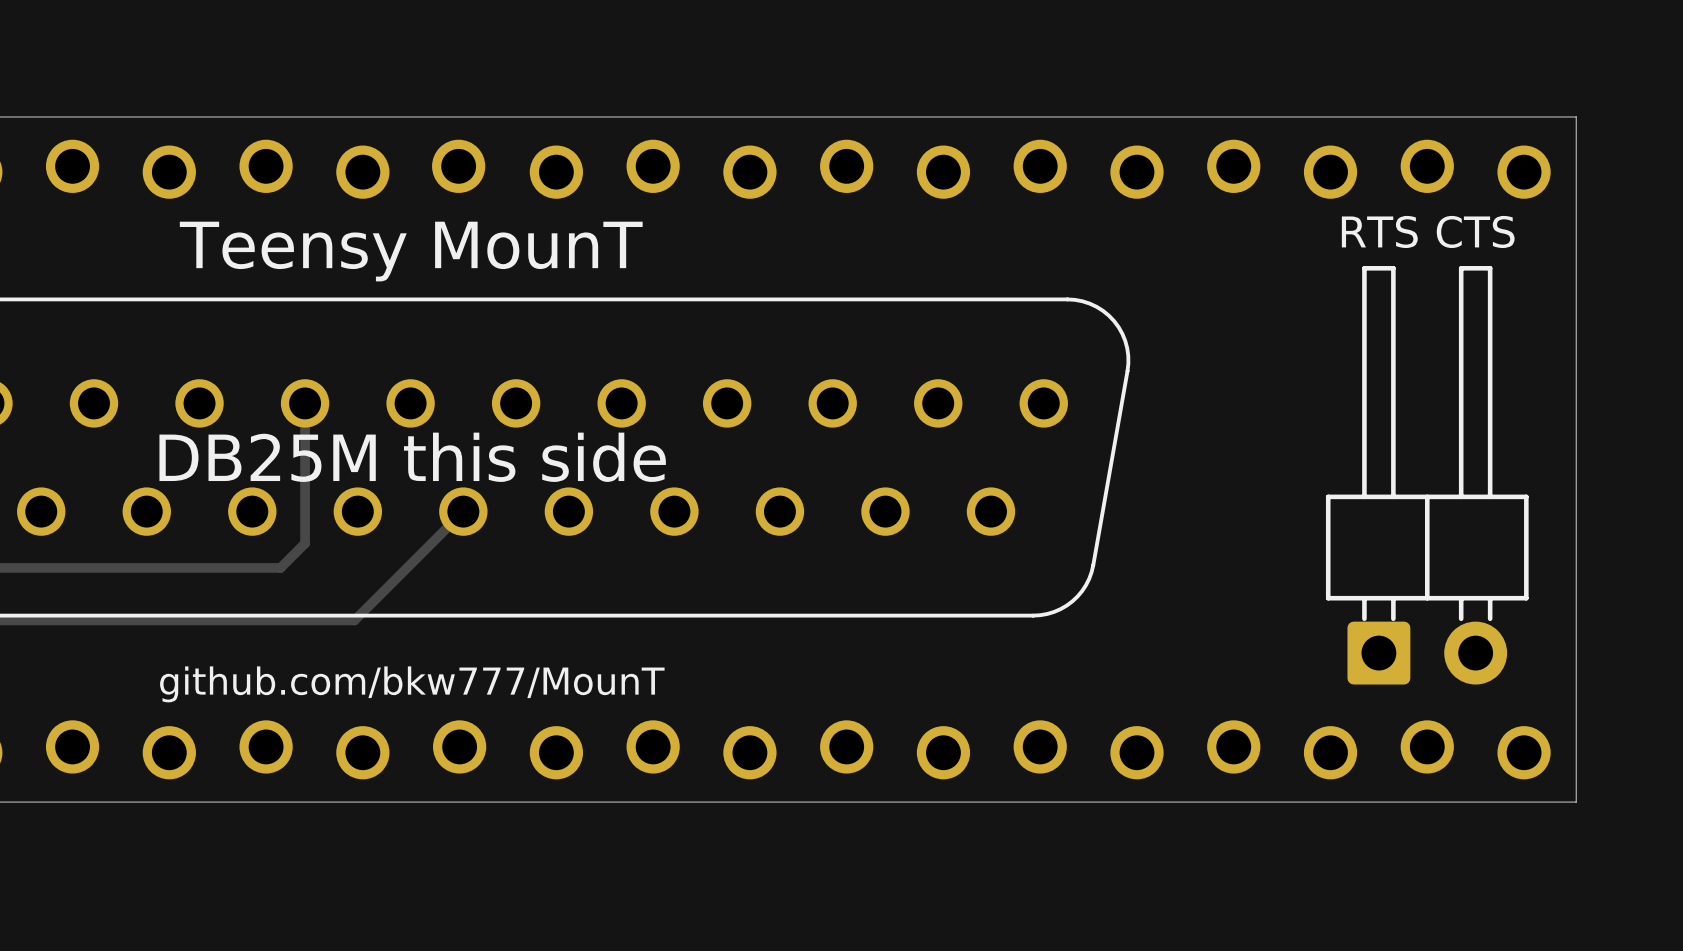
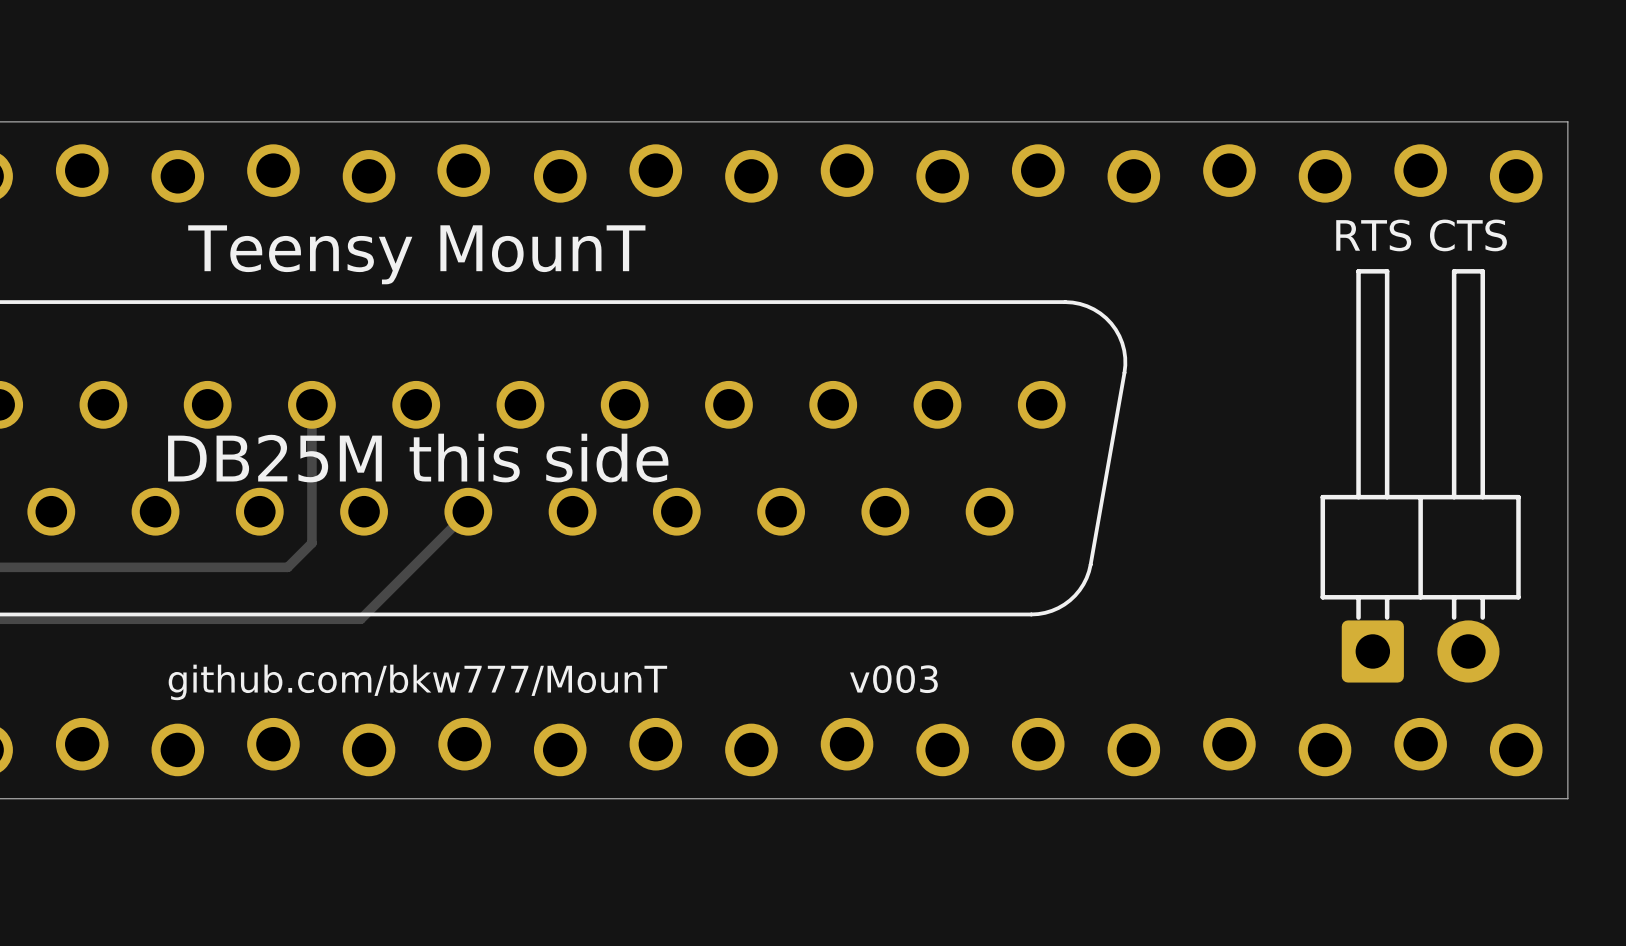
text: none -> v003 (893, 679)

